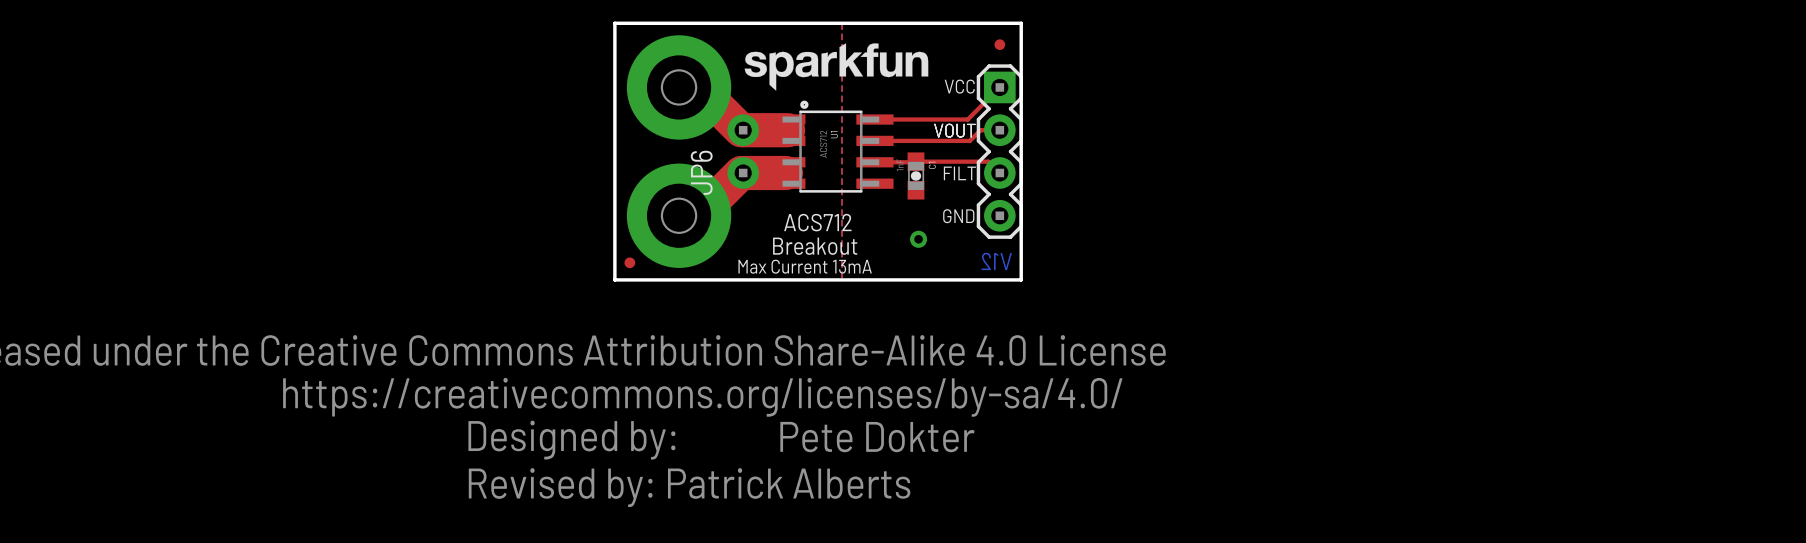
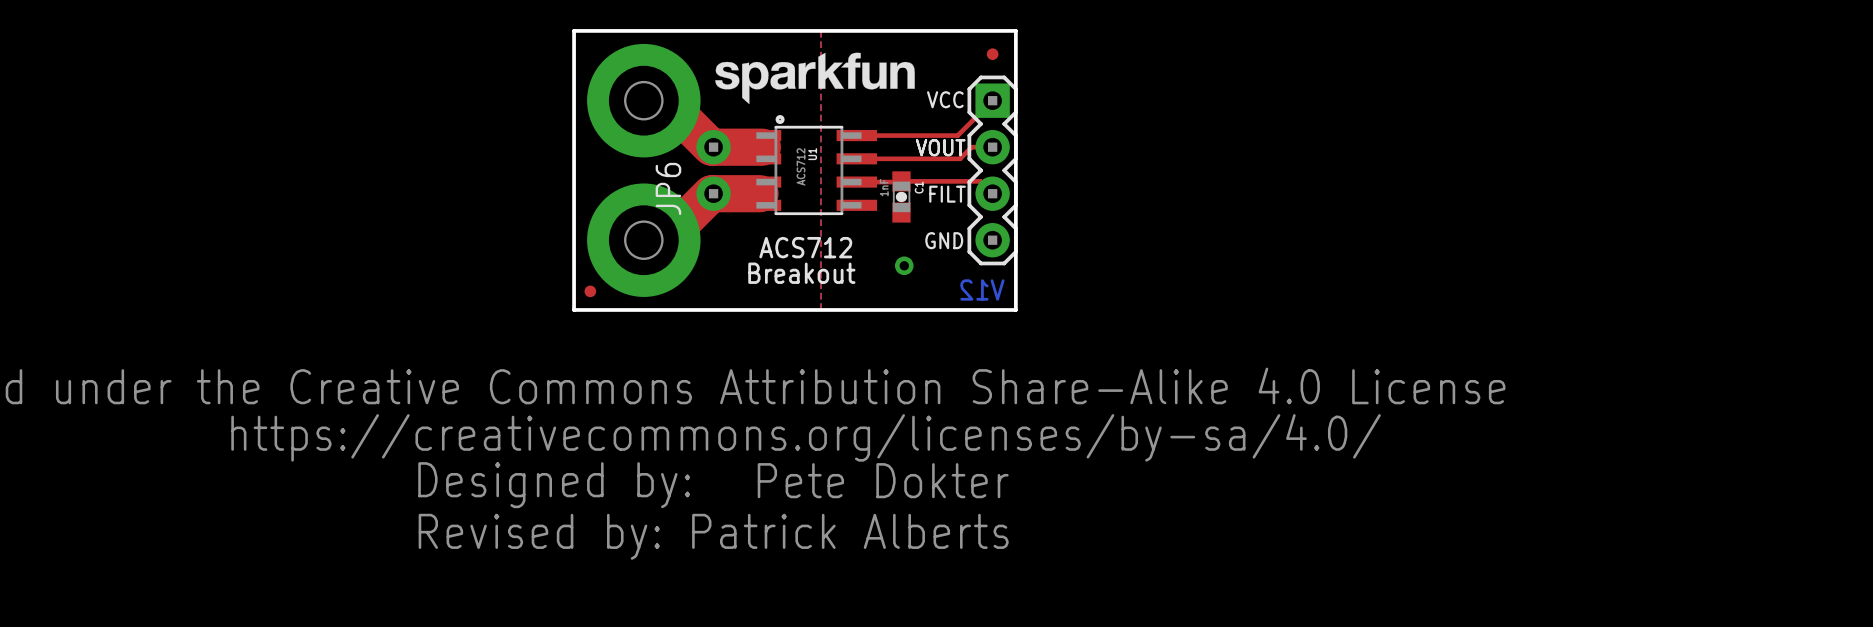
text: Max Current 13mA (805, 266) -> none

